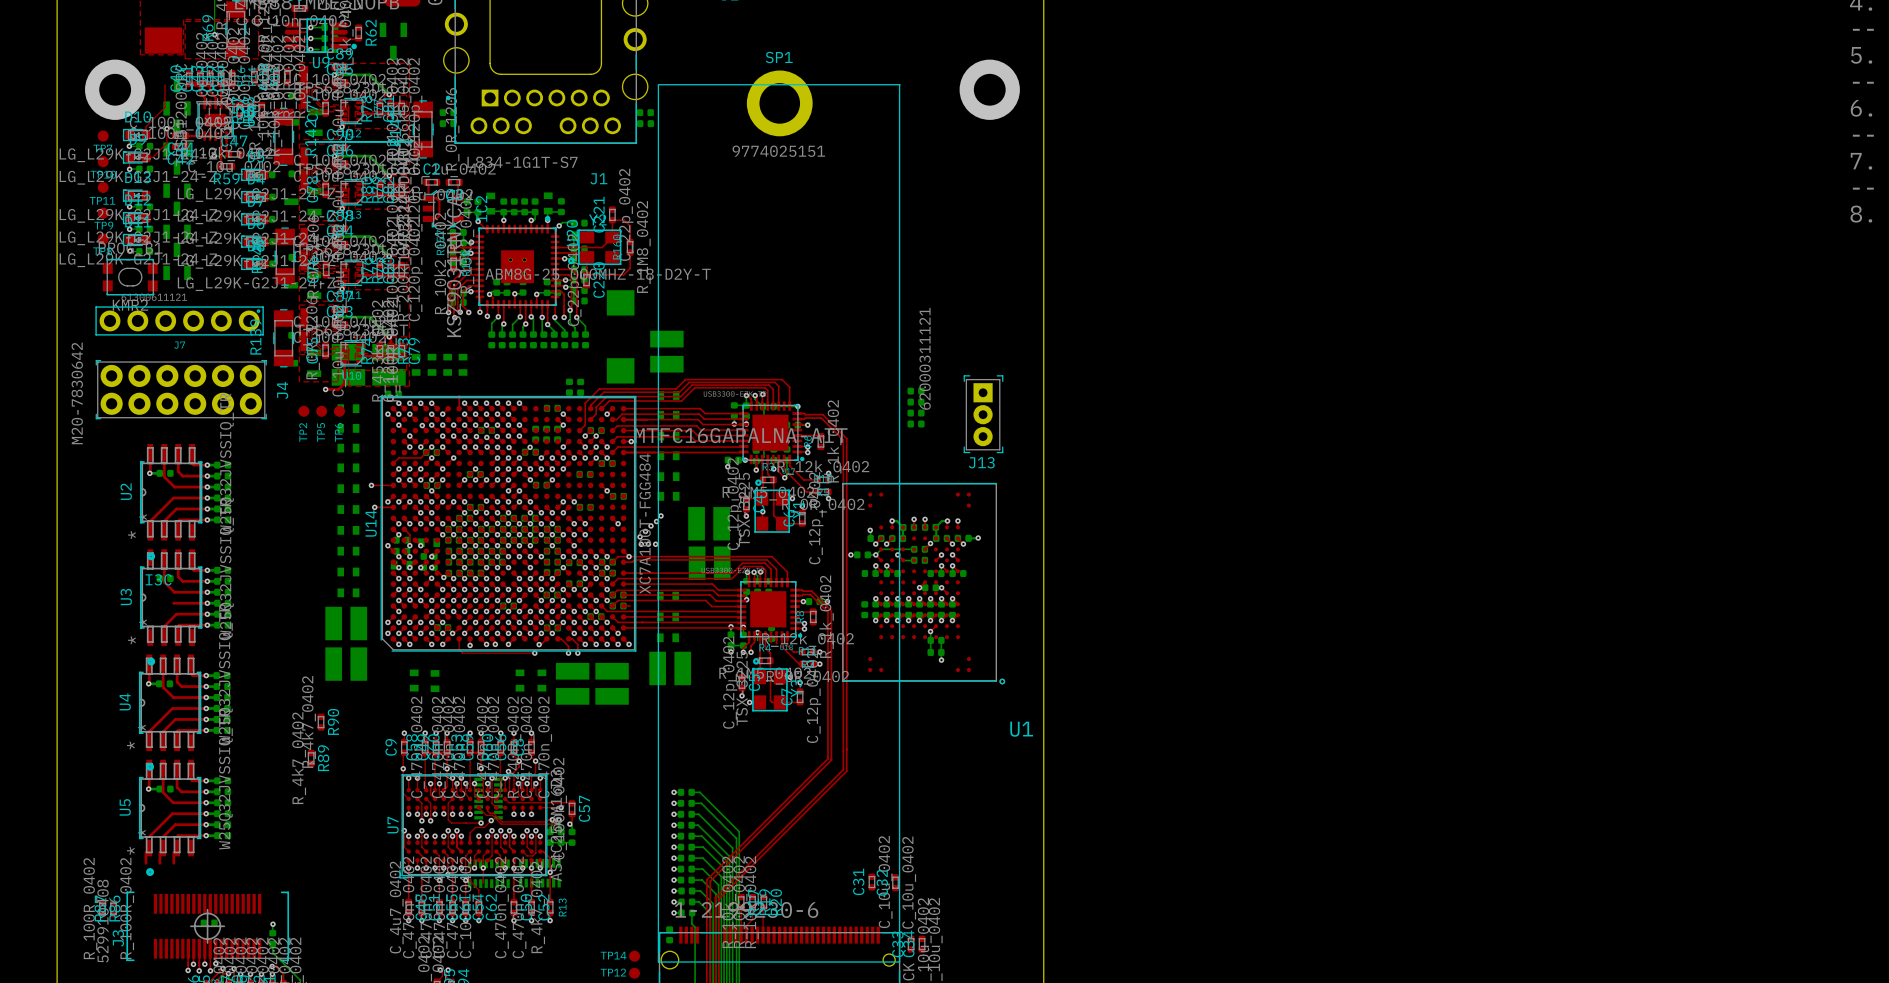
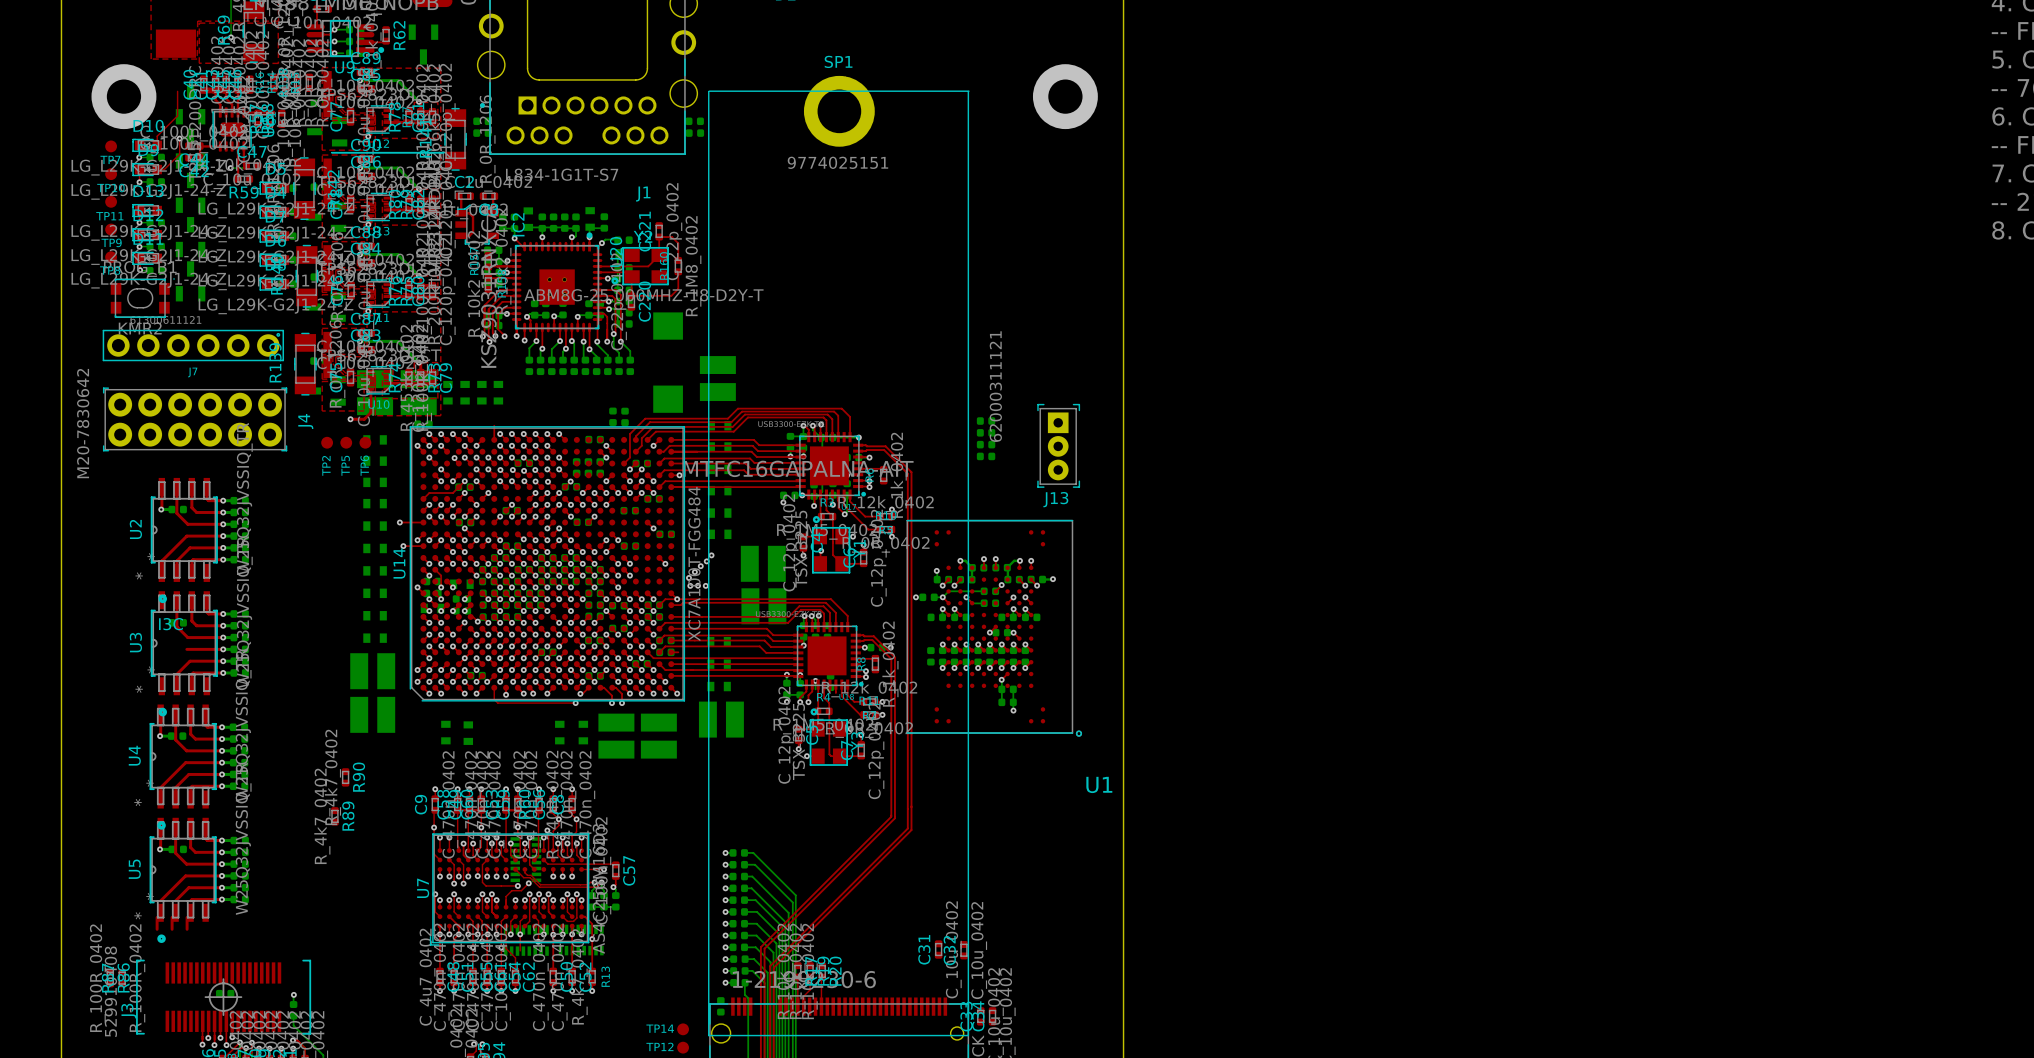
R142 position: (283, 136) -> (304, 188)

